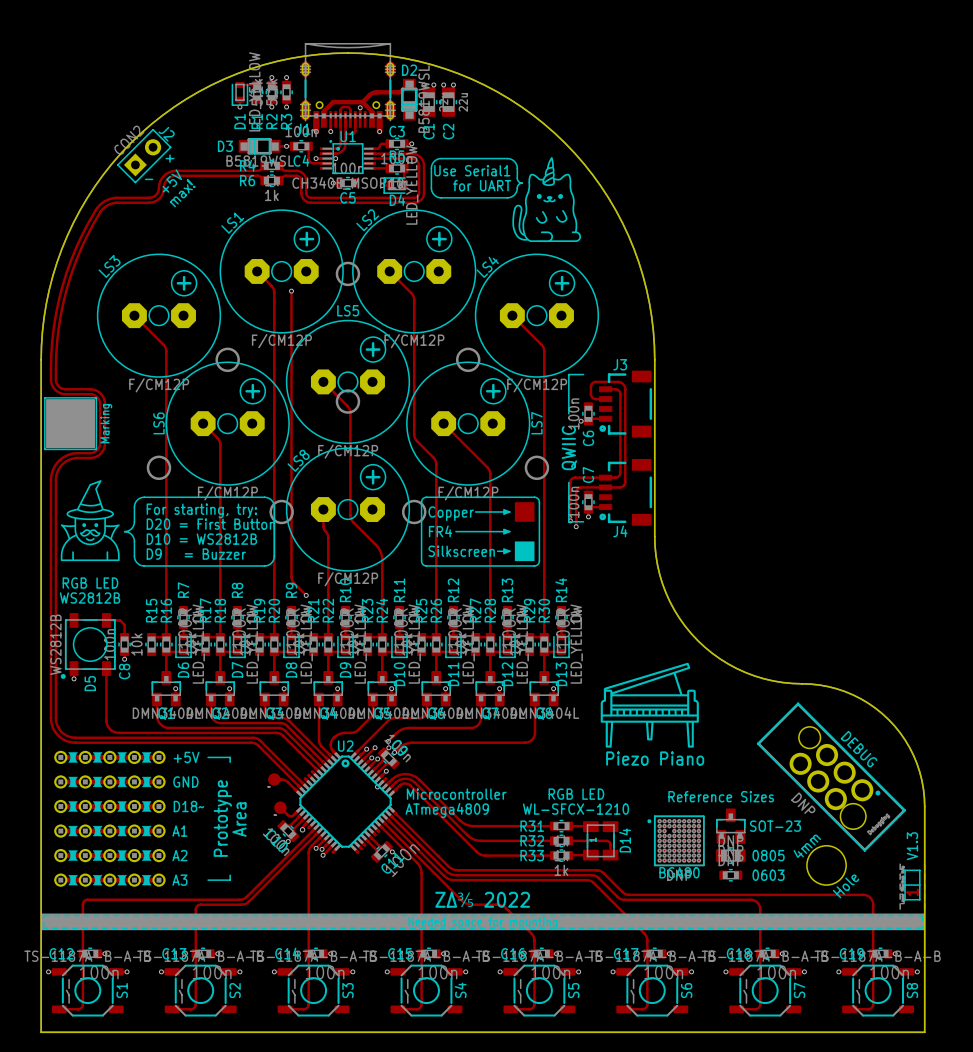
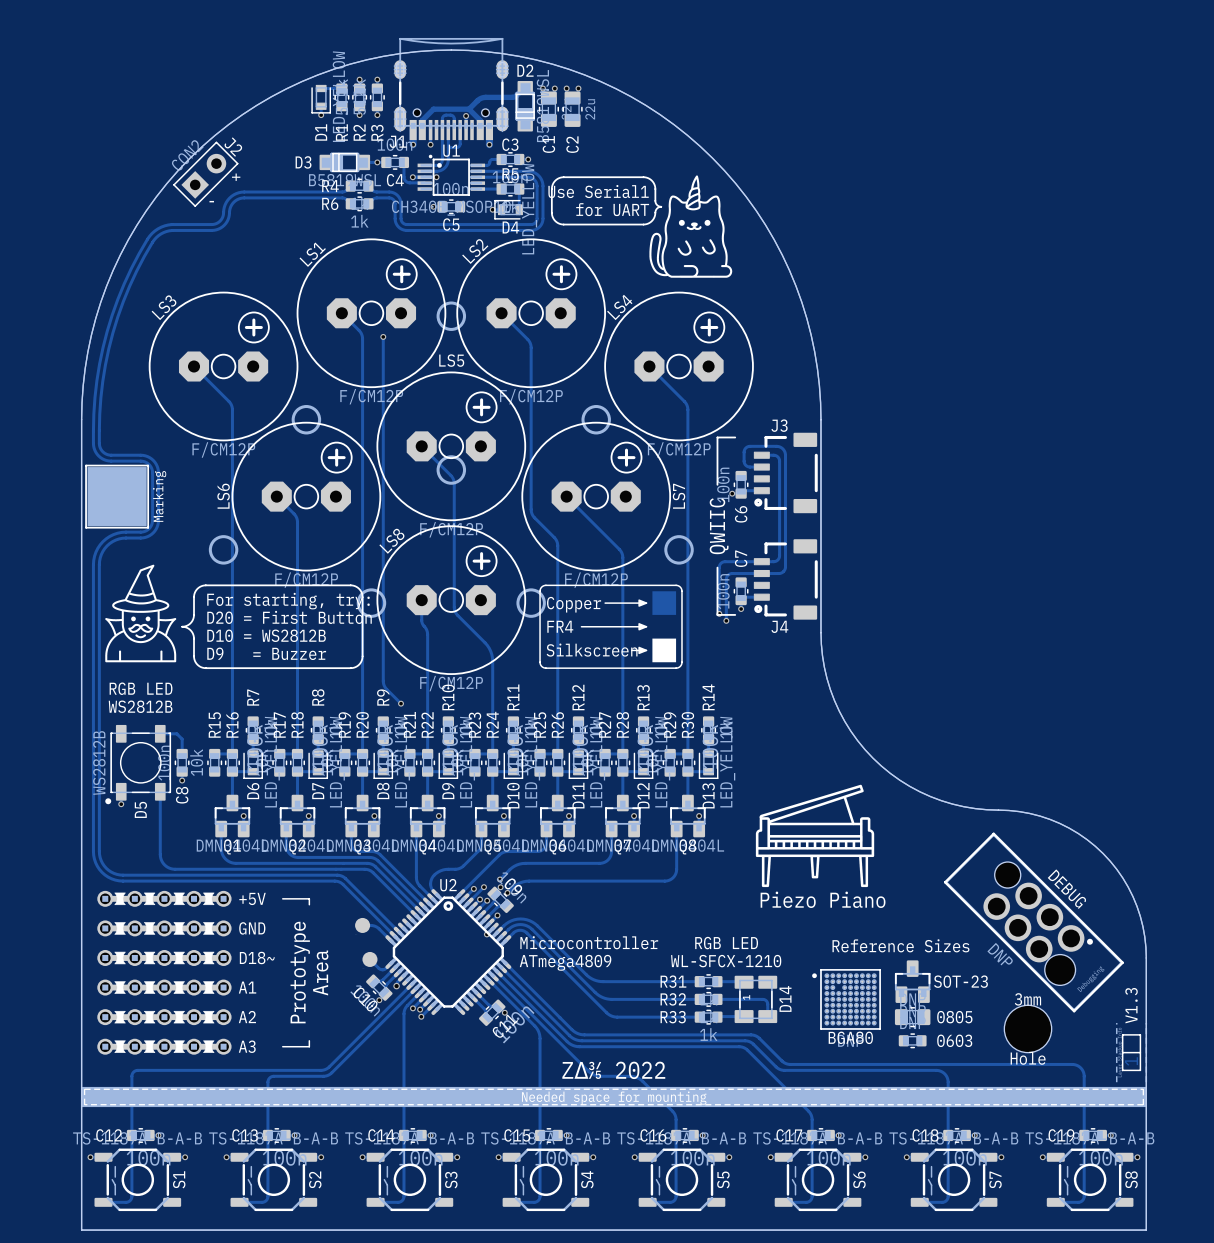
text: +5V (172, 181) -> none
text: max! (182, 193) -> none
text: 4mm (807, 846) -> 3mm (1027, 999)
text rotation: 0° (846, 886) -> 45° clockwise (1028, 1058)

